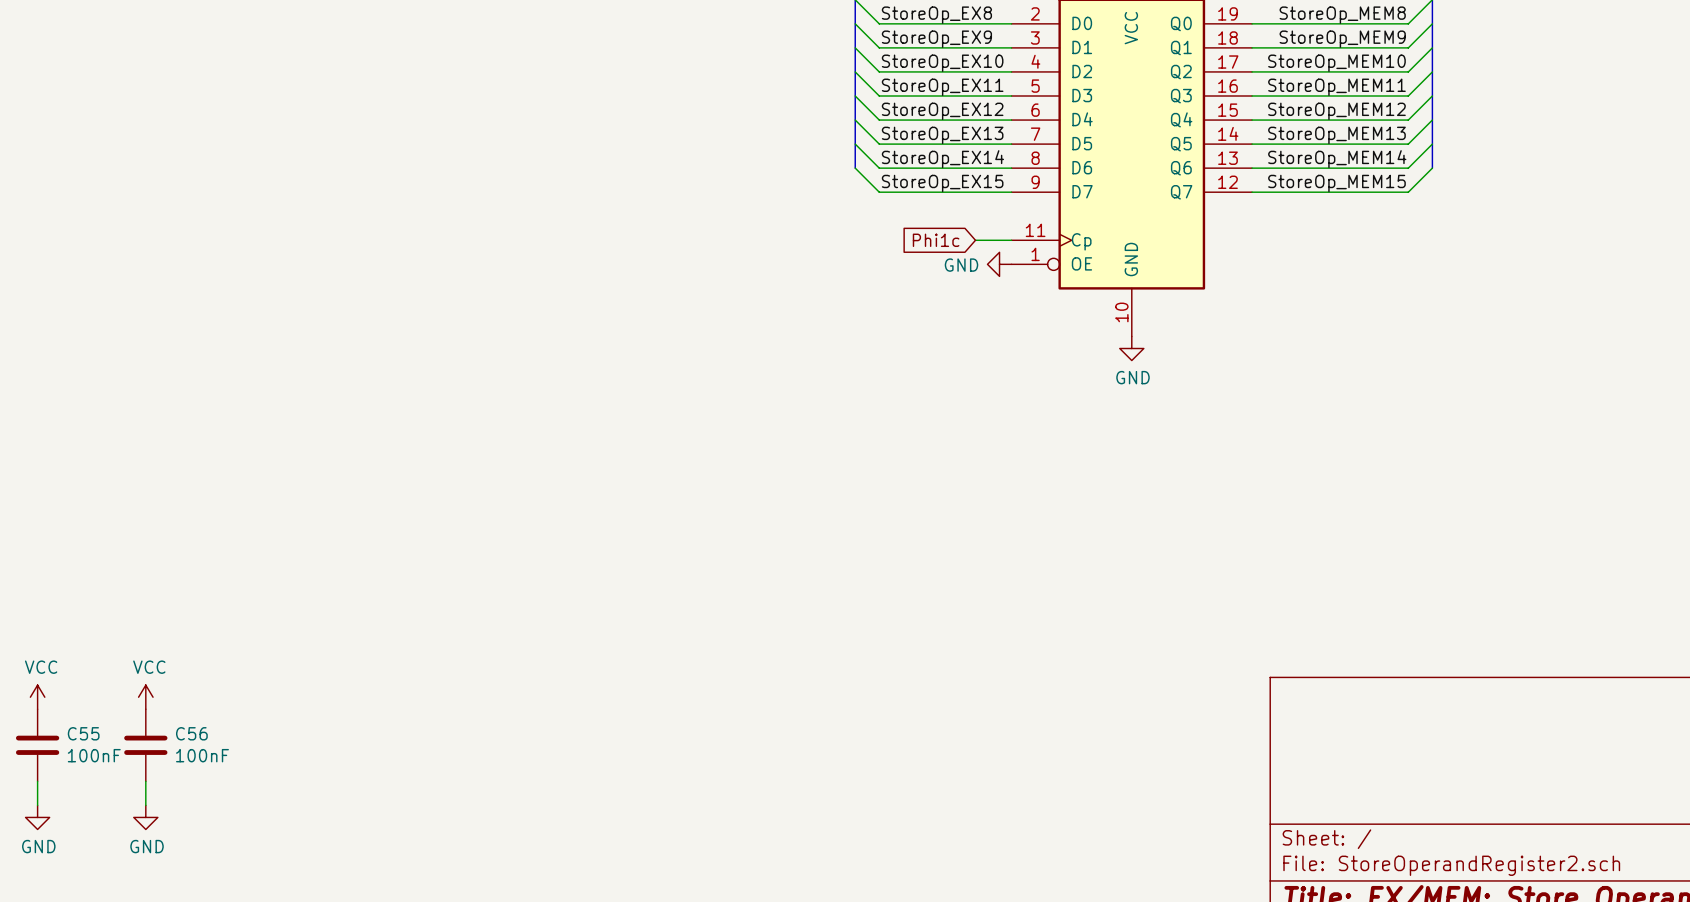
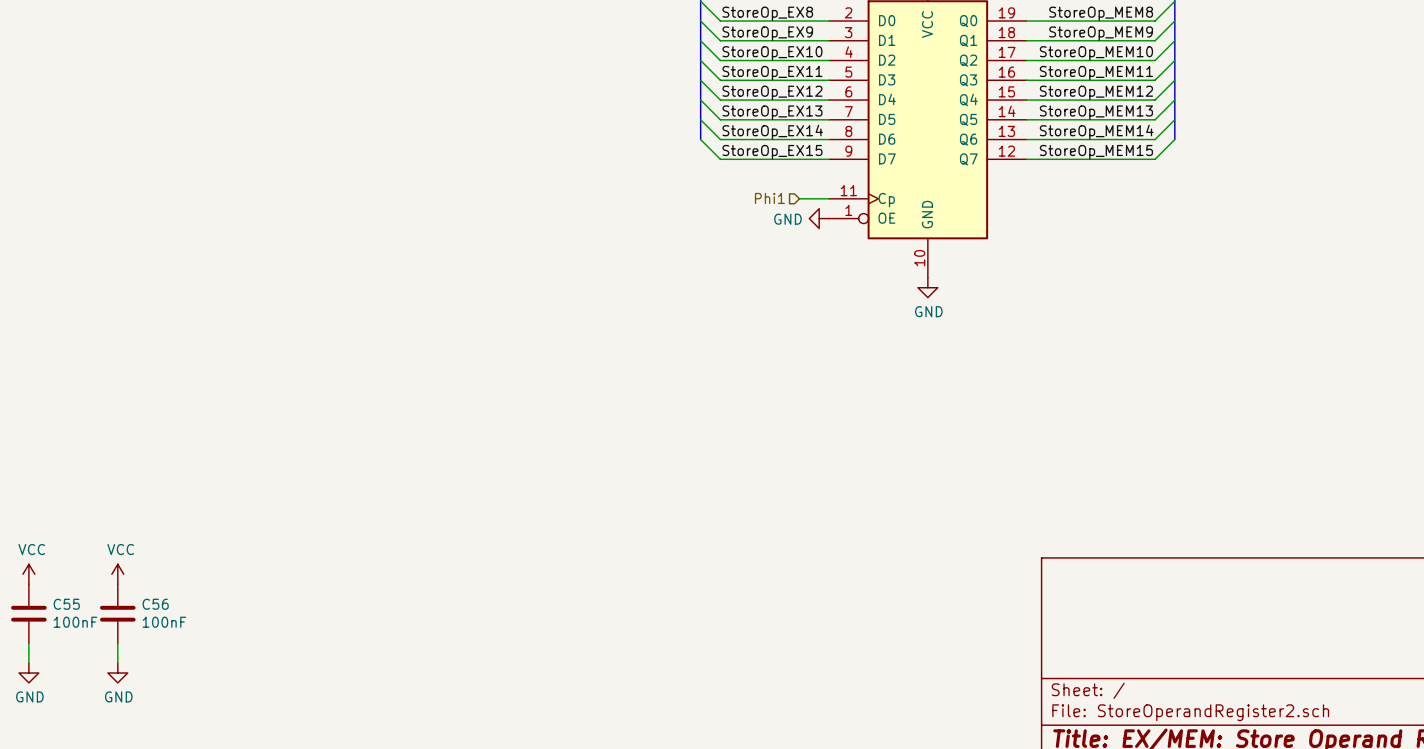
hierarchical label: none -> Phi1 (769, 198)
global label: Phi1c (936, 240) -> none

